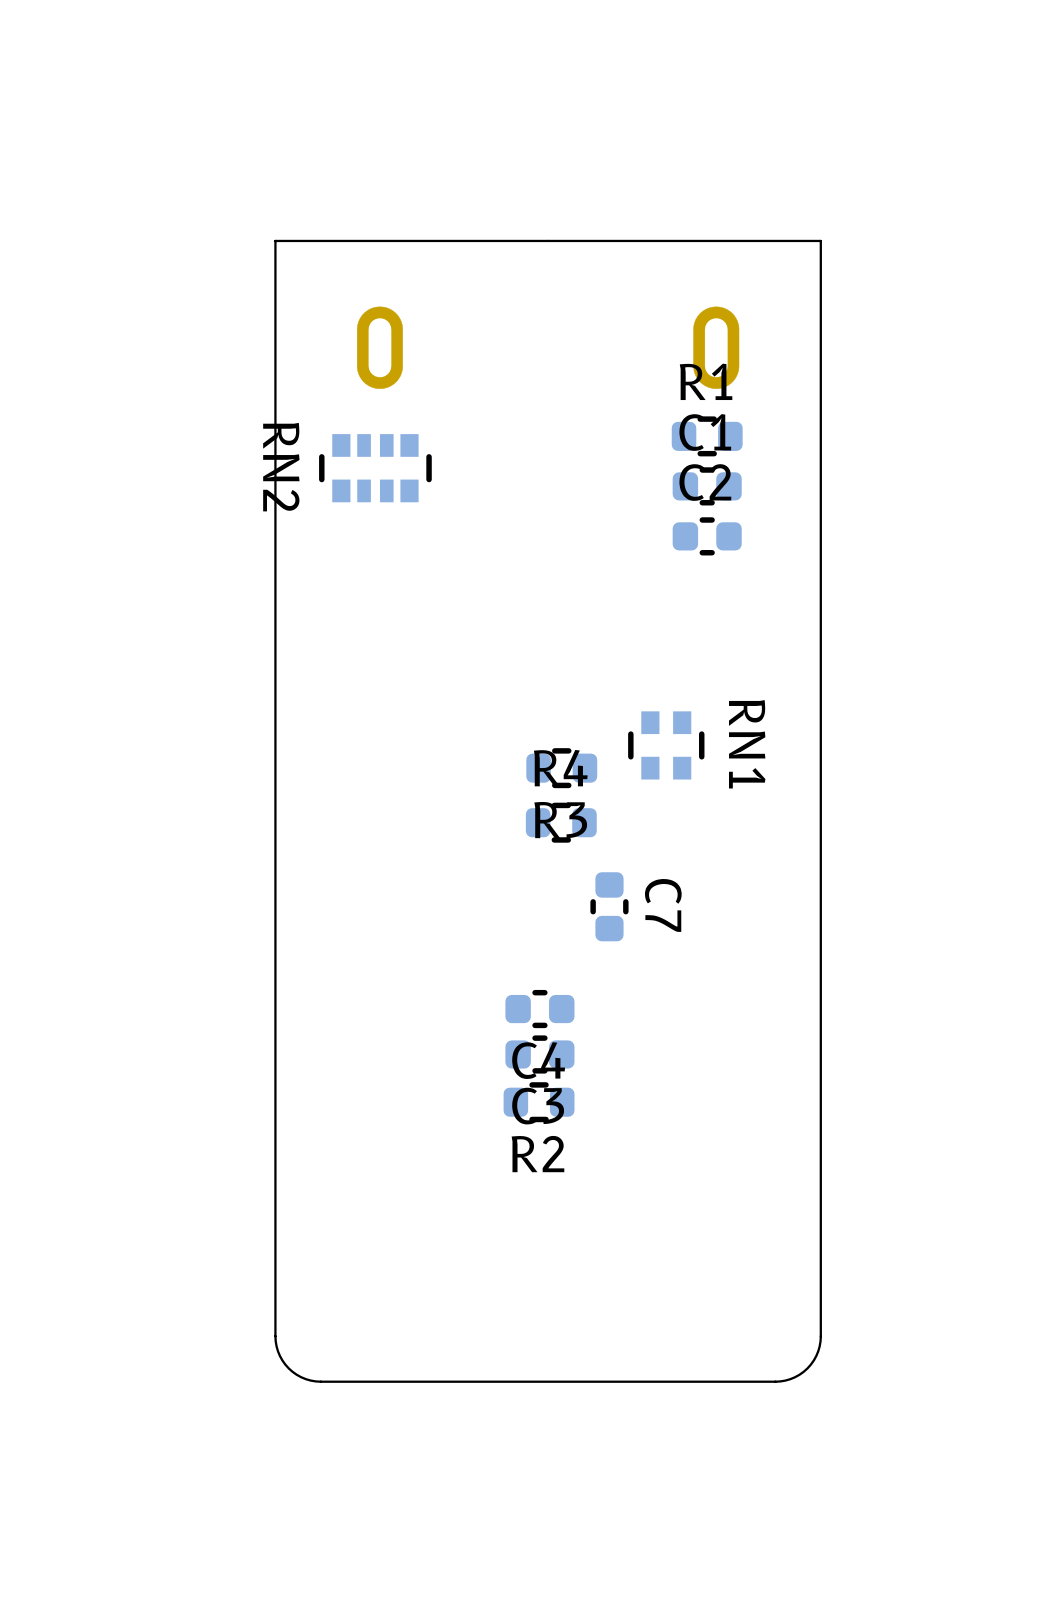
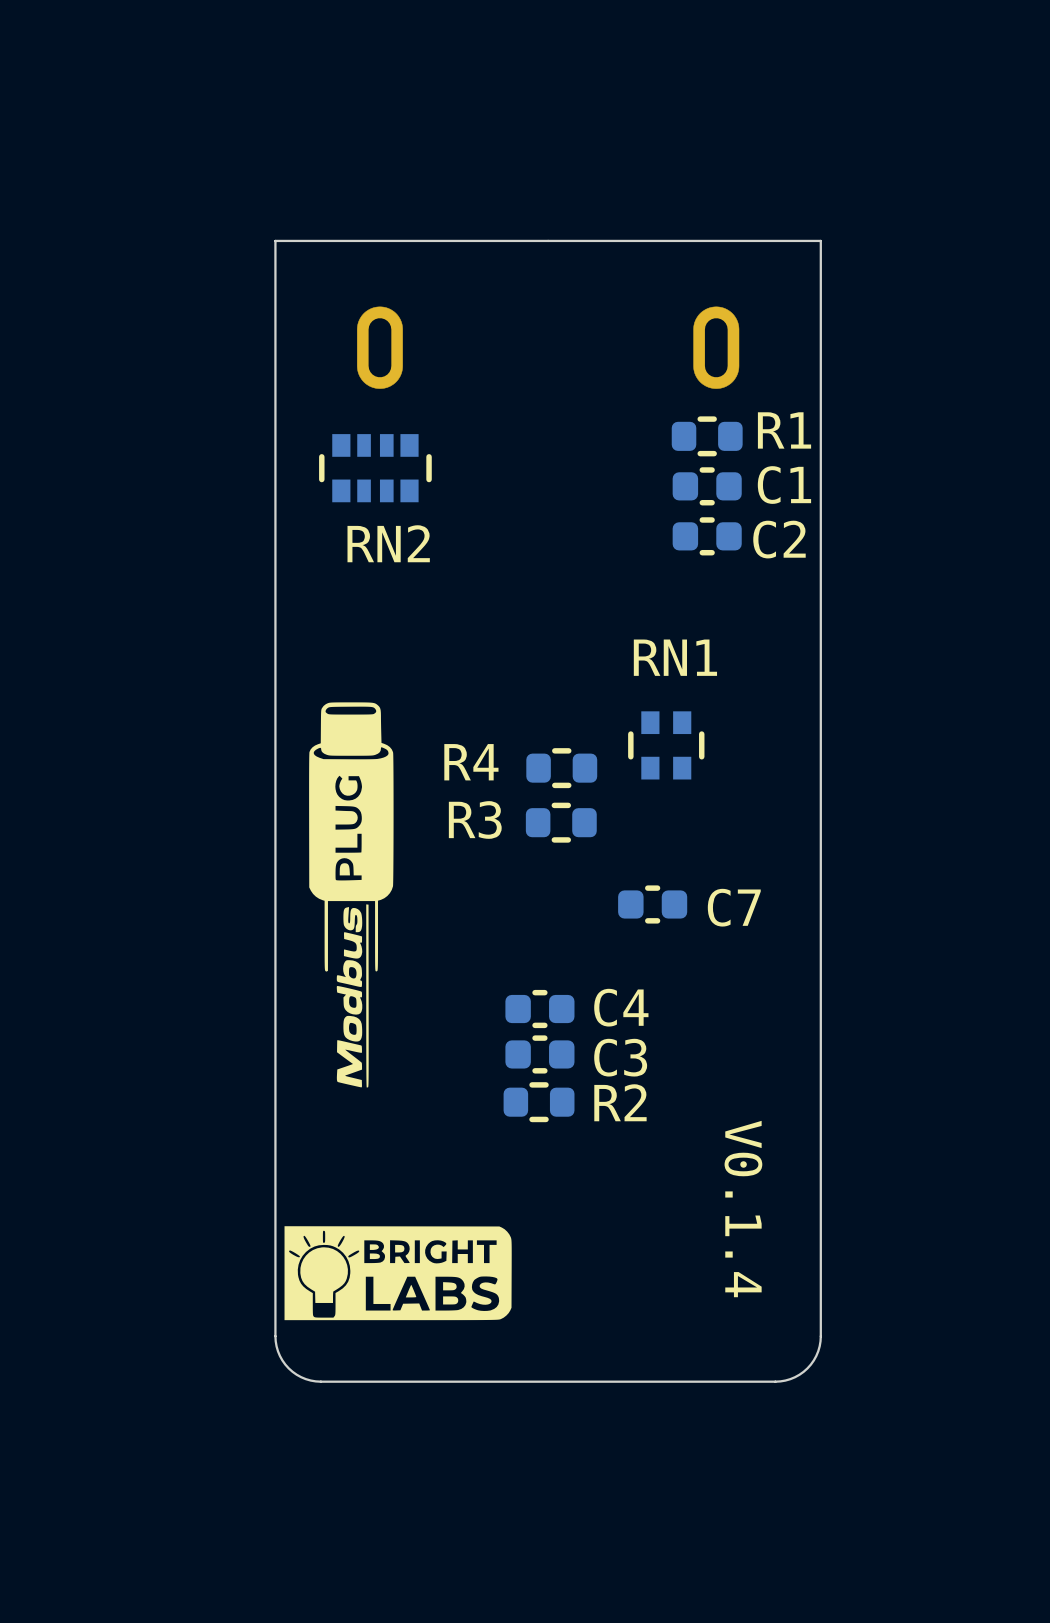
R1 name position: R1 (706, 381) -> R1 (784, 430)
C1 name position: C1 (705, 432) -> C1 (784, 485)
RN2 name rotation: 0° (281, 467) -> 90° counterclockwise (388, 543)
RN2 name position: RN2 (281, 467) -> RN2 (388, 543)
C2 name position: C2 (705, 482) -> C2 (779, 539)
drawing: none -> [309, 702, 394, 1088]
RN1 name rotation: 0° (747, 744) -> 90° counterclockwise (675, 657)
R4 name position: R4 (560, 768) -> R4 (471, 762)
R3 name position: R3 (560, 820) -> R3 (475, 819)
C7 rotation: 0° (609, 906) -> 90° clockwise (652, 904)
C7 position: (609, 906) -> (652, 904)
C4 name position: C4 (538, 1060) -> C4 (621, 1007)
C3 name position: C3 (538, 1106) -> C3 (620, 1057)
R2 name position: R2 (537, 1154) -> R2 (620, 1102)
text: none -> V0.1.4 (743, 1209)
drawing: none -> [284, 1226, 512, 1321]

